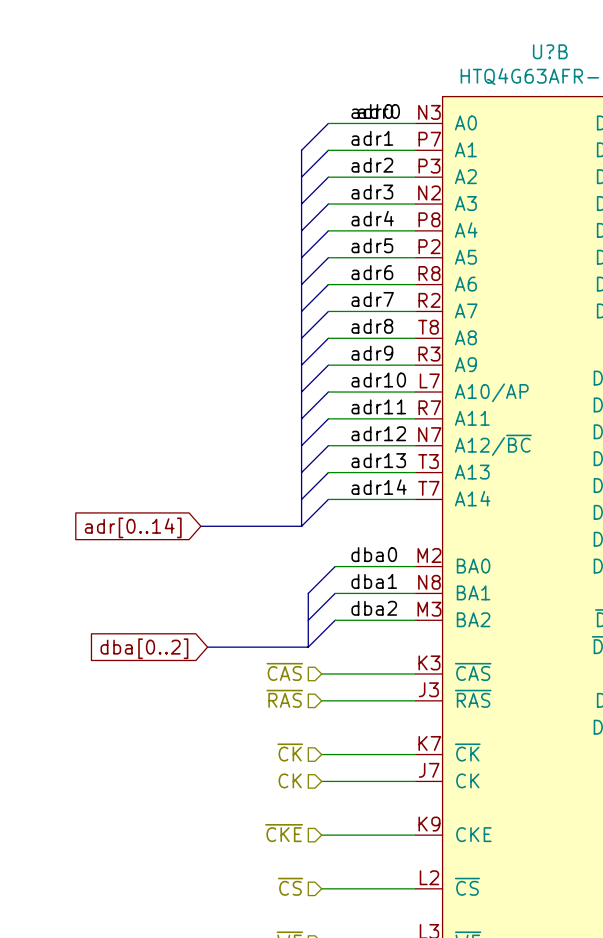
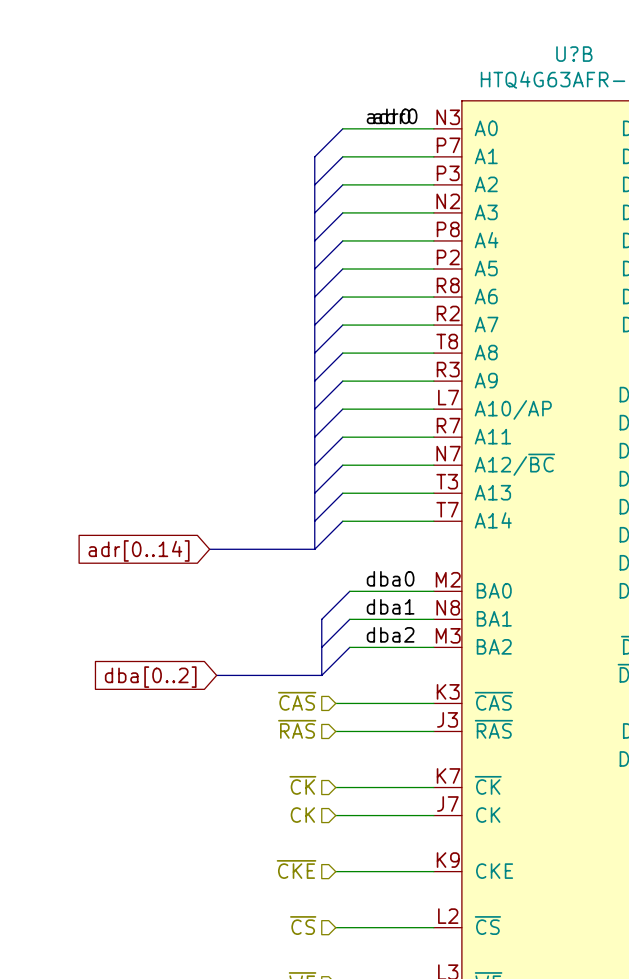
label: adr1 (372, 138) -> none
label: adr2 (372, 165) -> none
label: adr3 (372, 192) -> none
label: adr4 (372, 218) -> none
label: adr5 (372, 245) -> none
label: adr6 (372, 272) -> none
label: adr7 (372, 299) -> none
label: adr8 (372, 326) -> none
label: adr9 (372, 353) -> none
label: adr10 (378, 380) -> none
label: adr11 (378, 406) -> none
label: adr12 (378, 433) -> none
label: adr13 (378, 460) -> none
label: adr14 (379, 487) -> none

